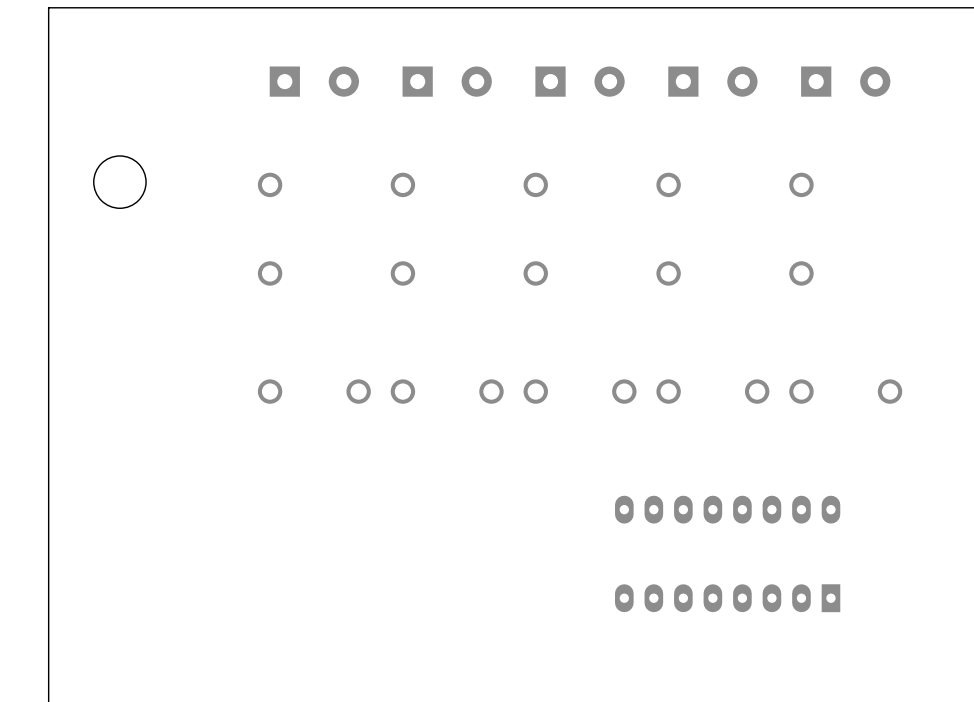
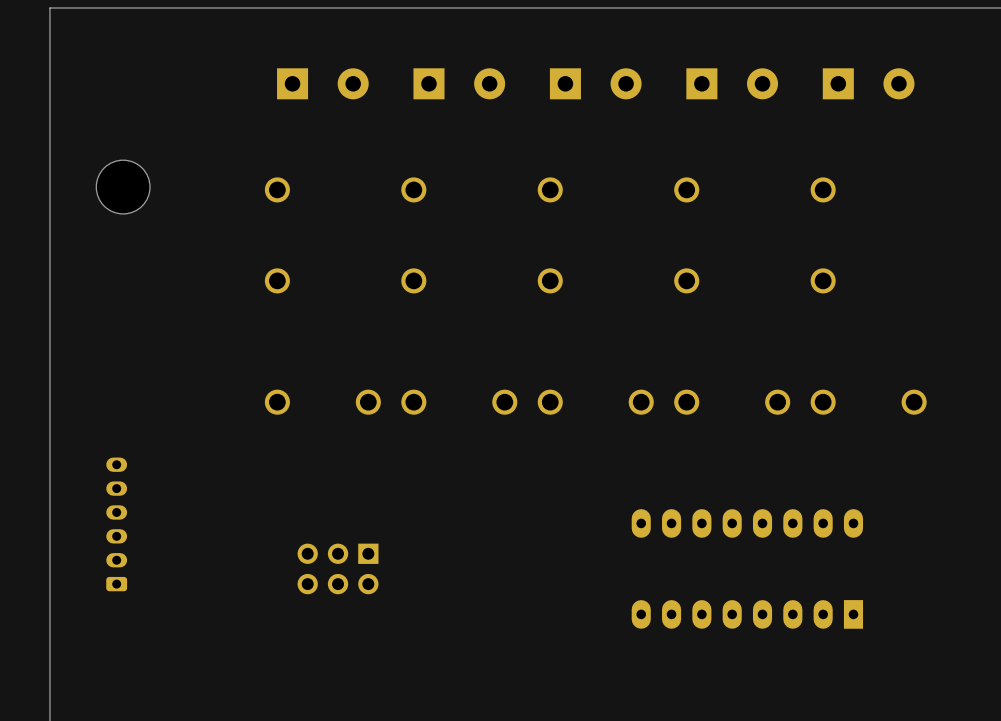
part: none -> (116, 524)
part: none -> (338, 568)

